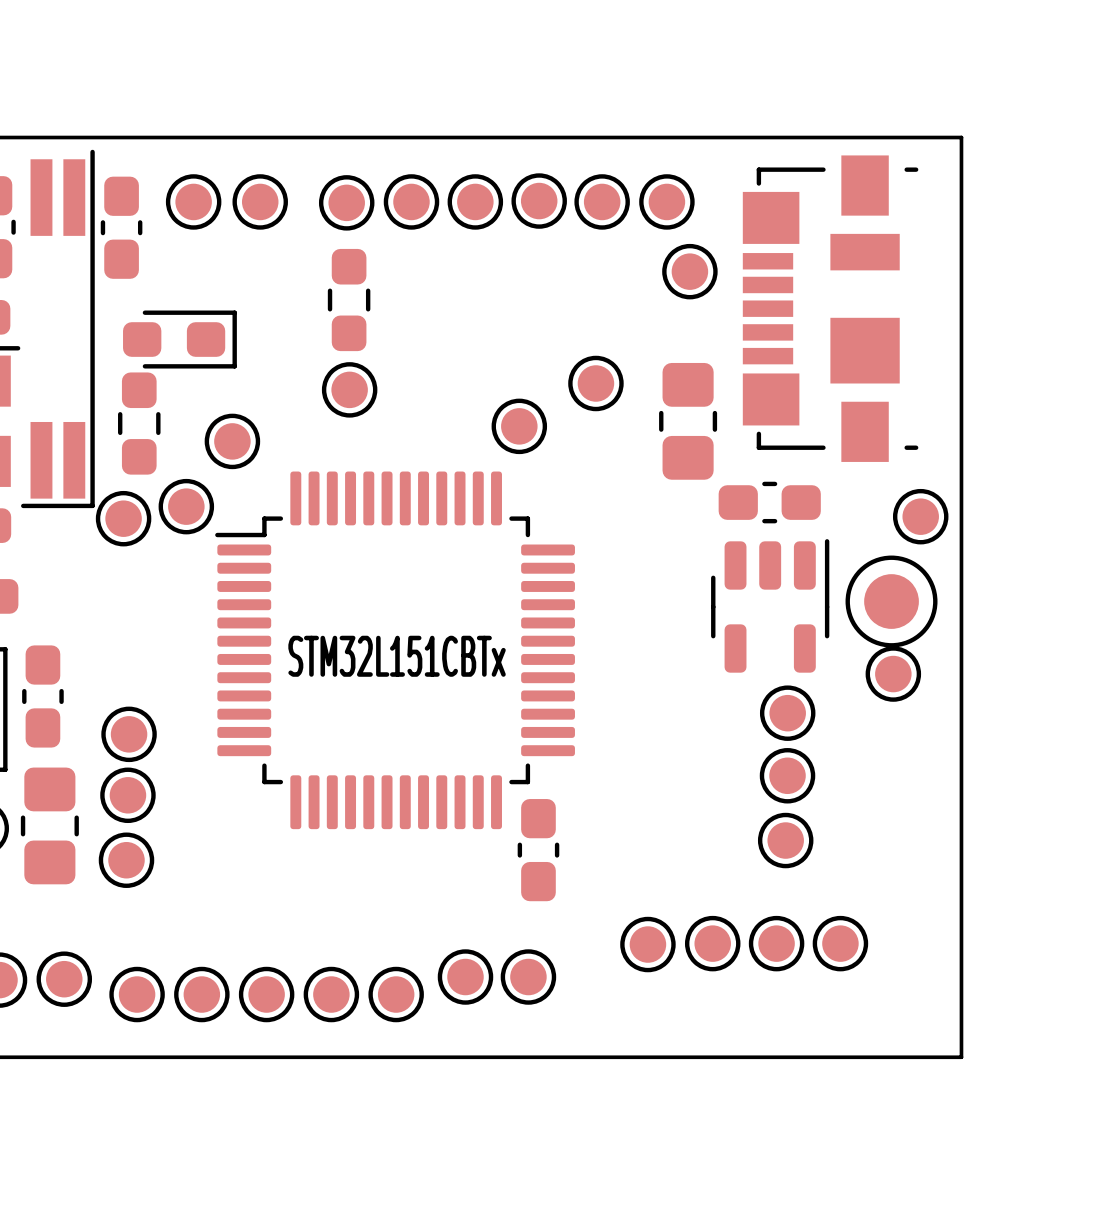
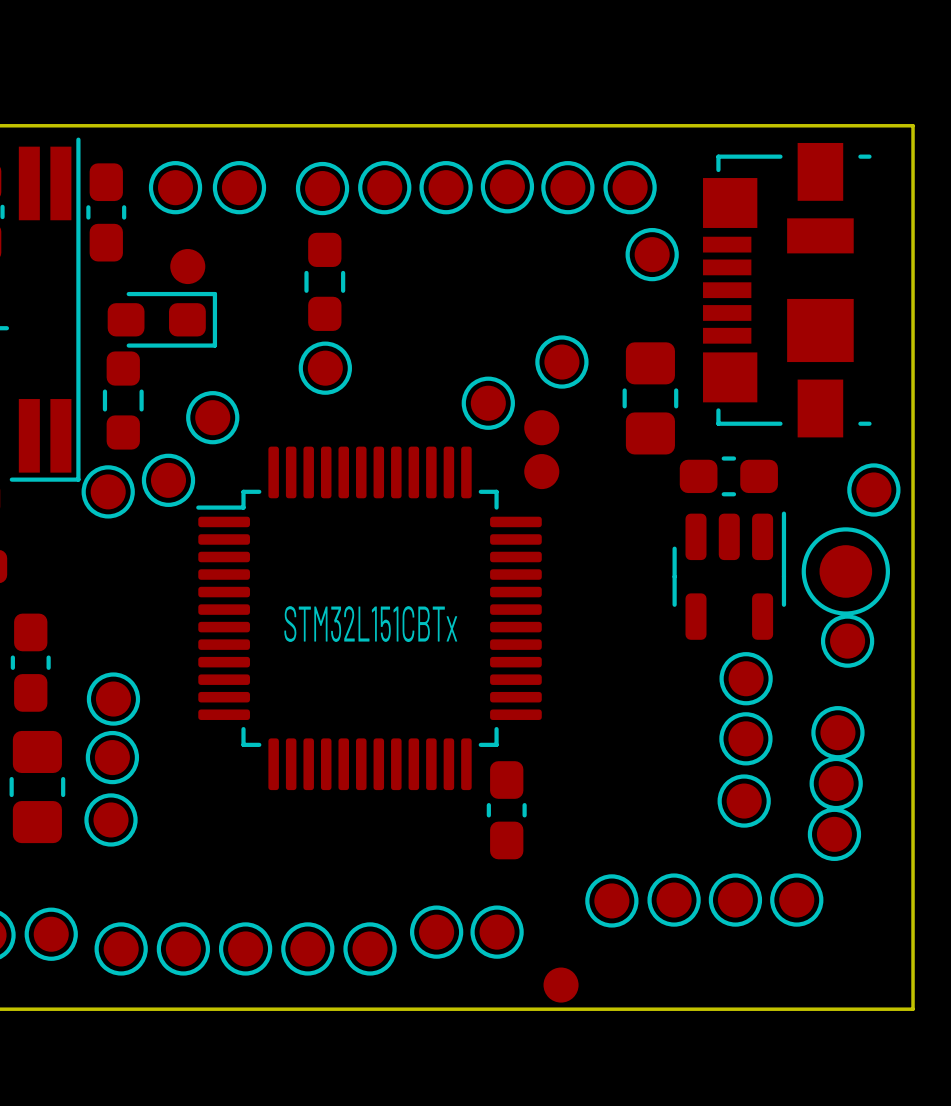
part: none -> (187, 266)
part: none -> (541, 427)
part: none -> (541, 471)
part: none -> (837, 732)
part: none -> (836, 783)
part: none -> (834, 834)
part: none -> (561, 985)

